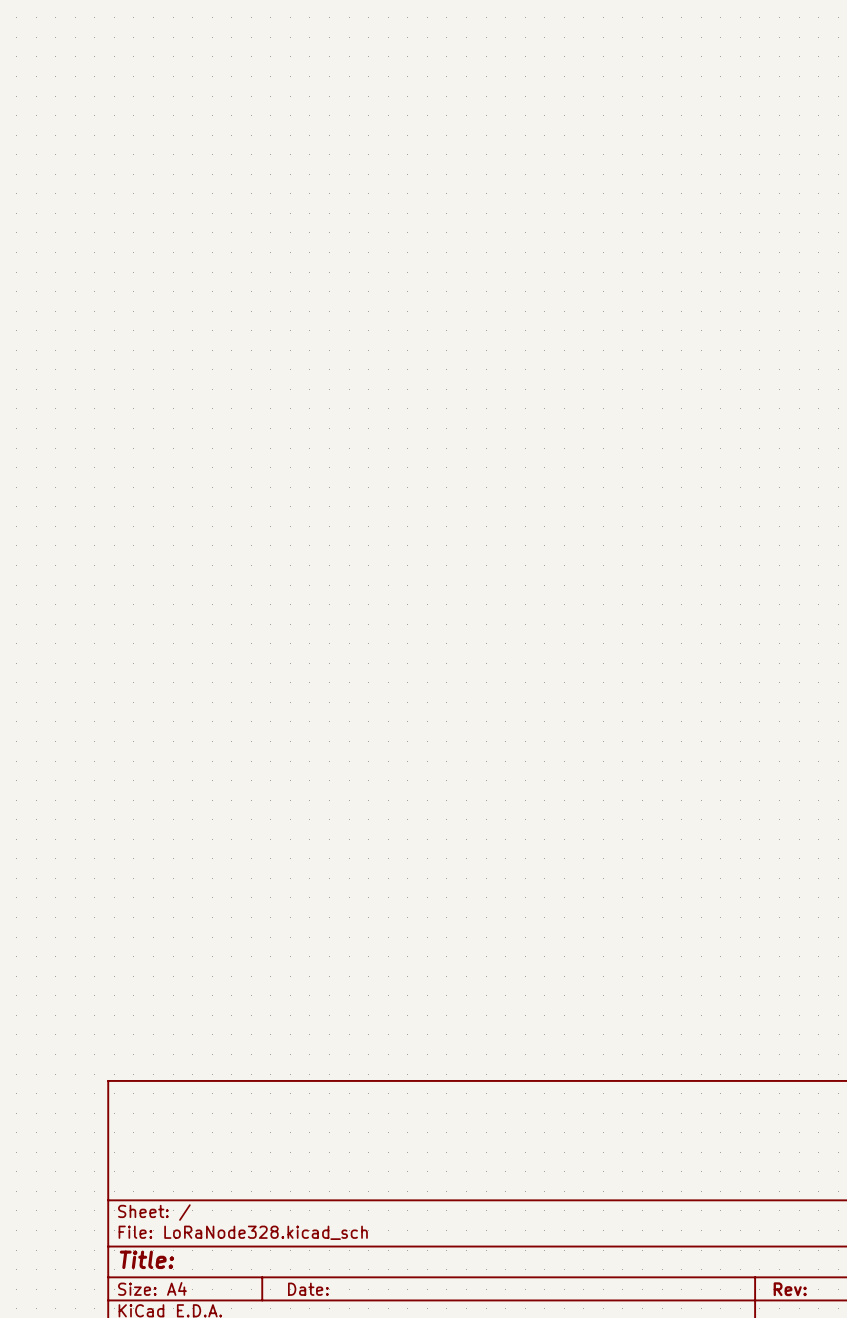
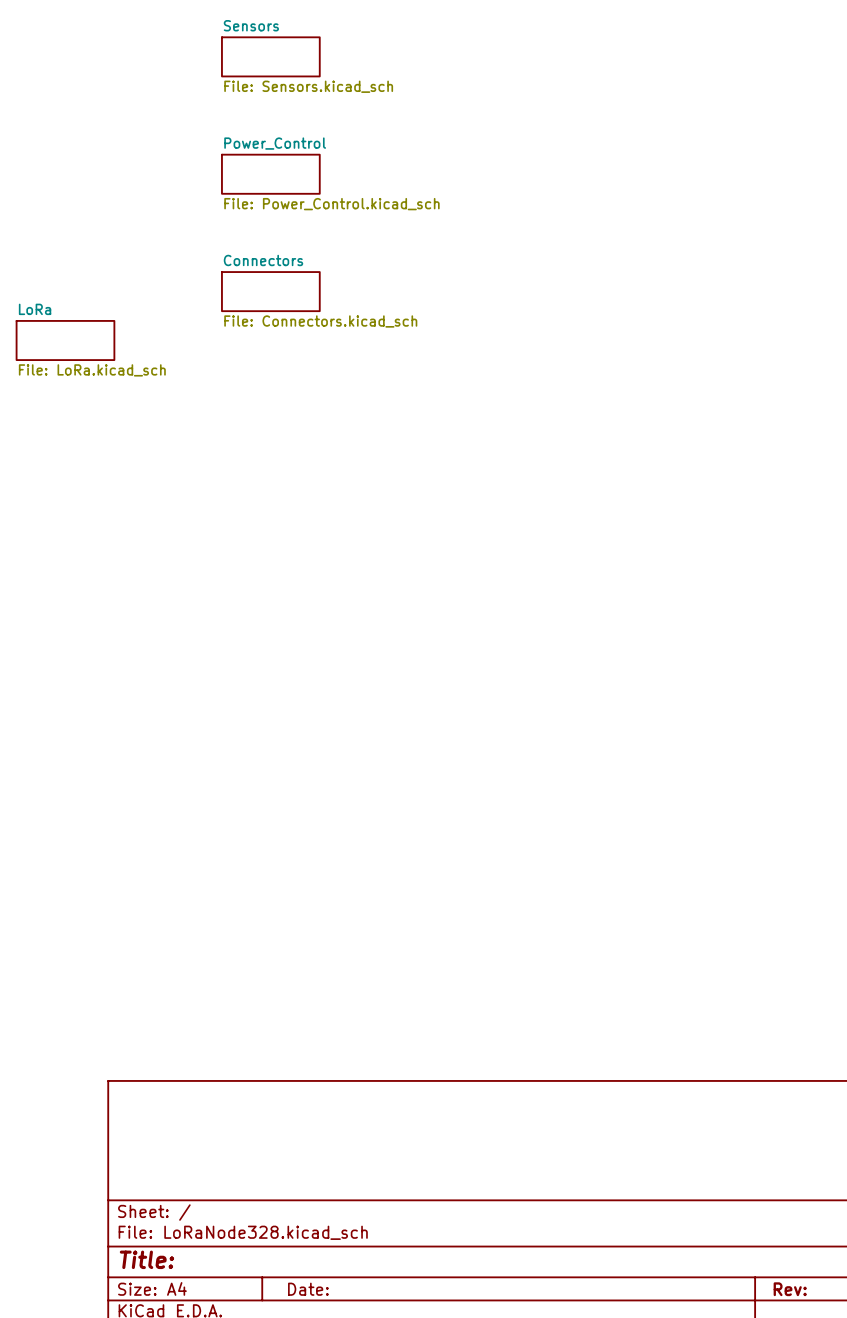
sheet Sensors: none -> File: Sensors.kicad_sch (270, 56)
sheet Power_Control: none -> File: Power_Control.kicad_sch (270, 174)
sheet Connectors: none -> File: Connectors.kicad_sch (270, 291)
sheet LoRa: none -> File: LoRa.kicad_sch (65, 340)

